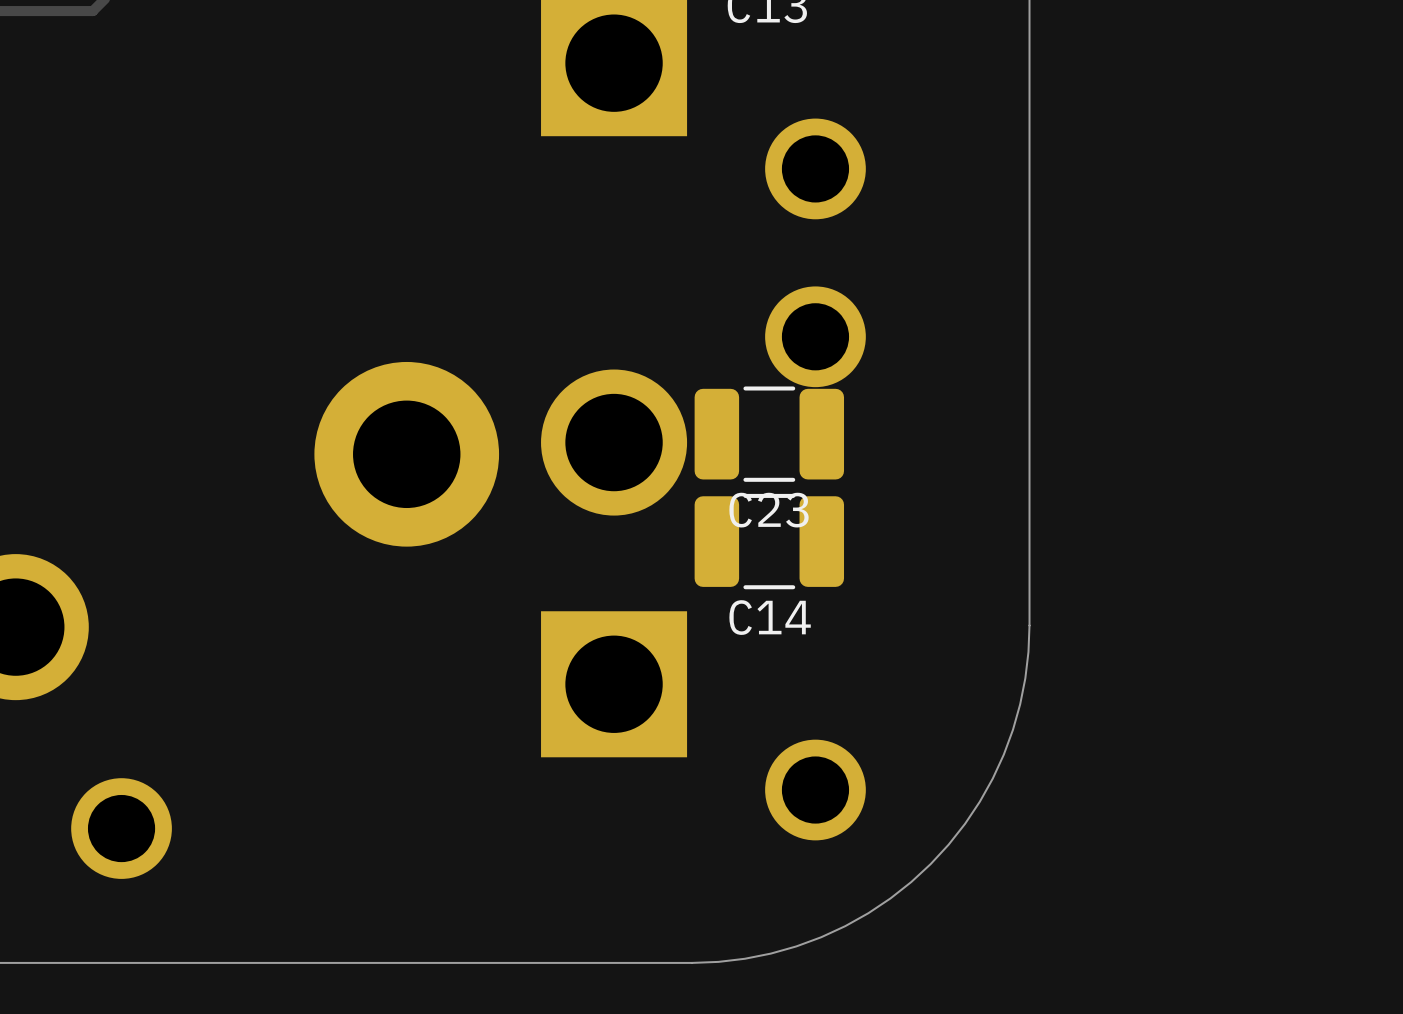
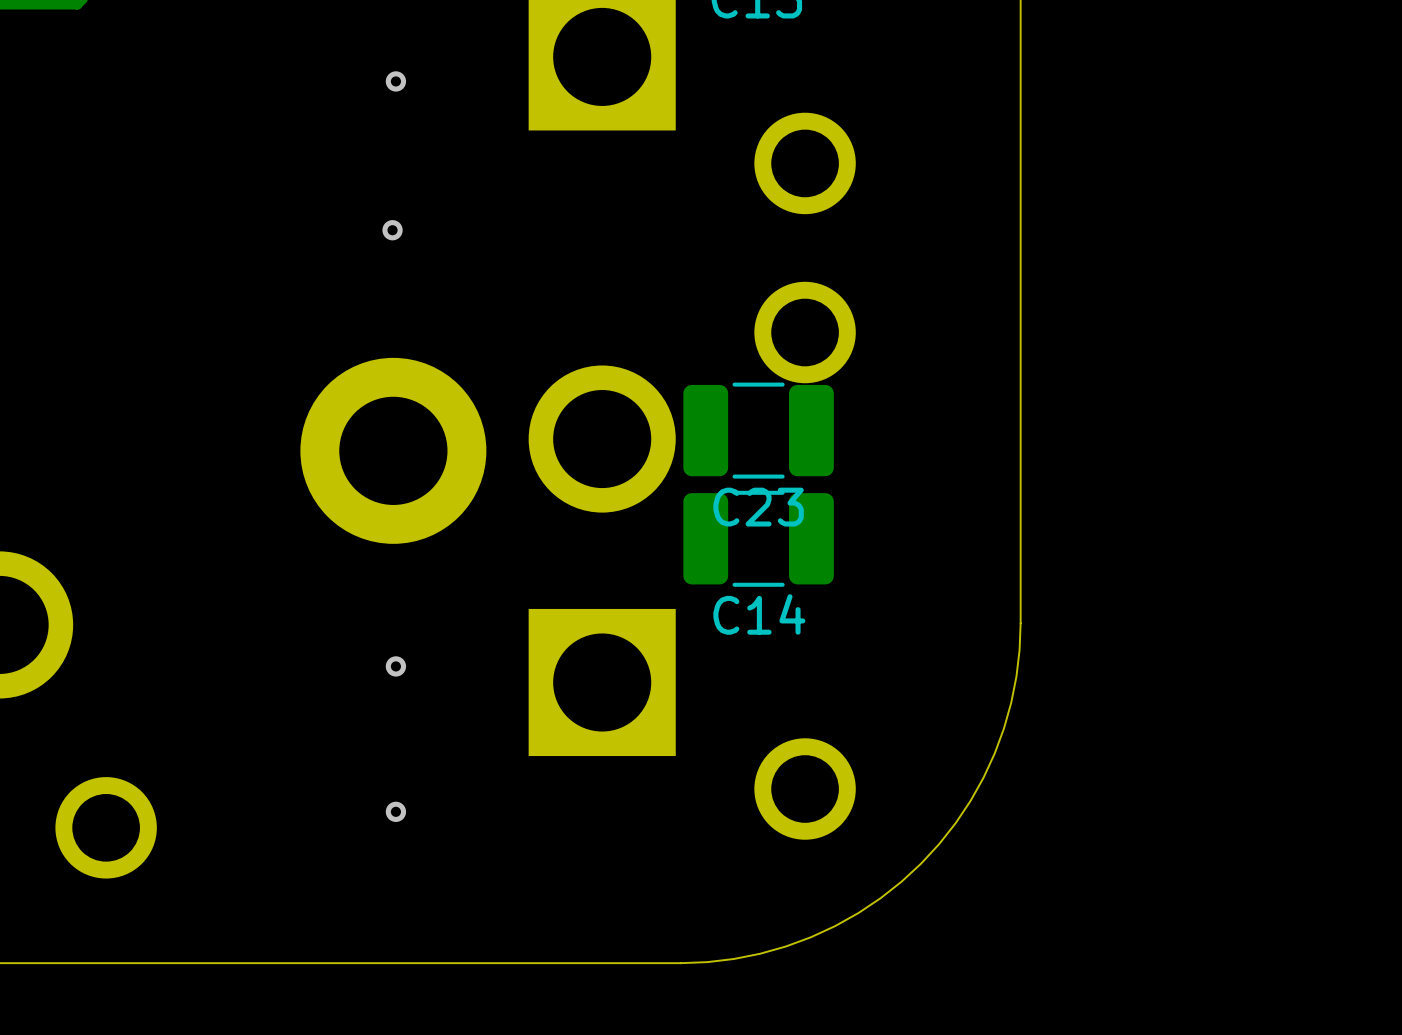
via: none -> (395, 81)
via: none -> (392, 230)
via: none -> (395, 666)
via: none -> (395, 811)

